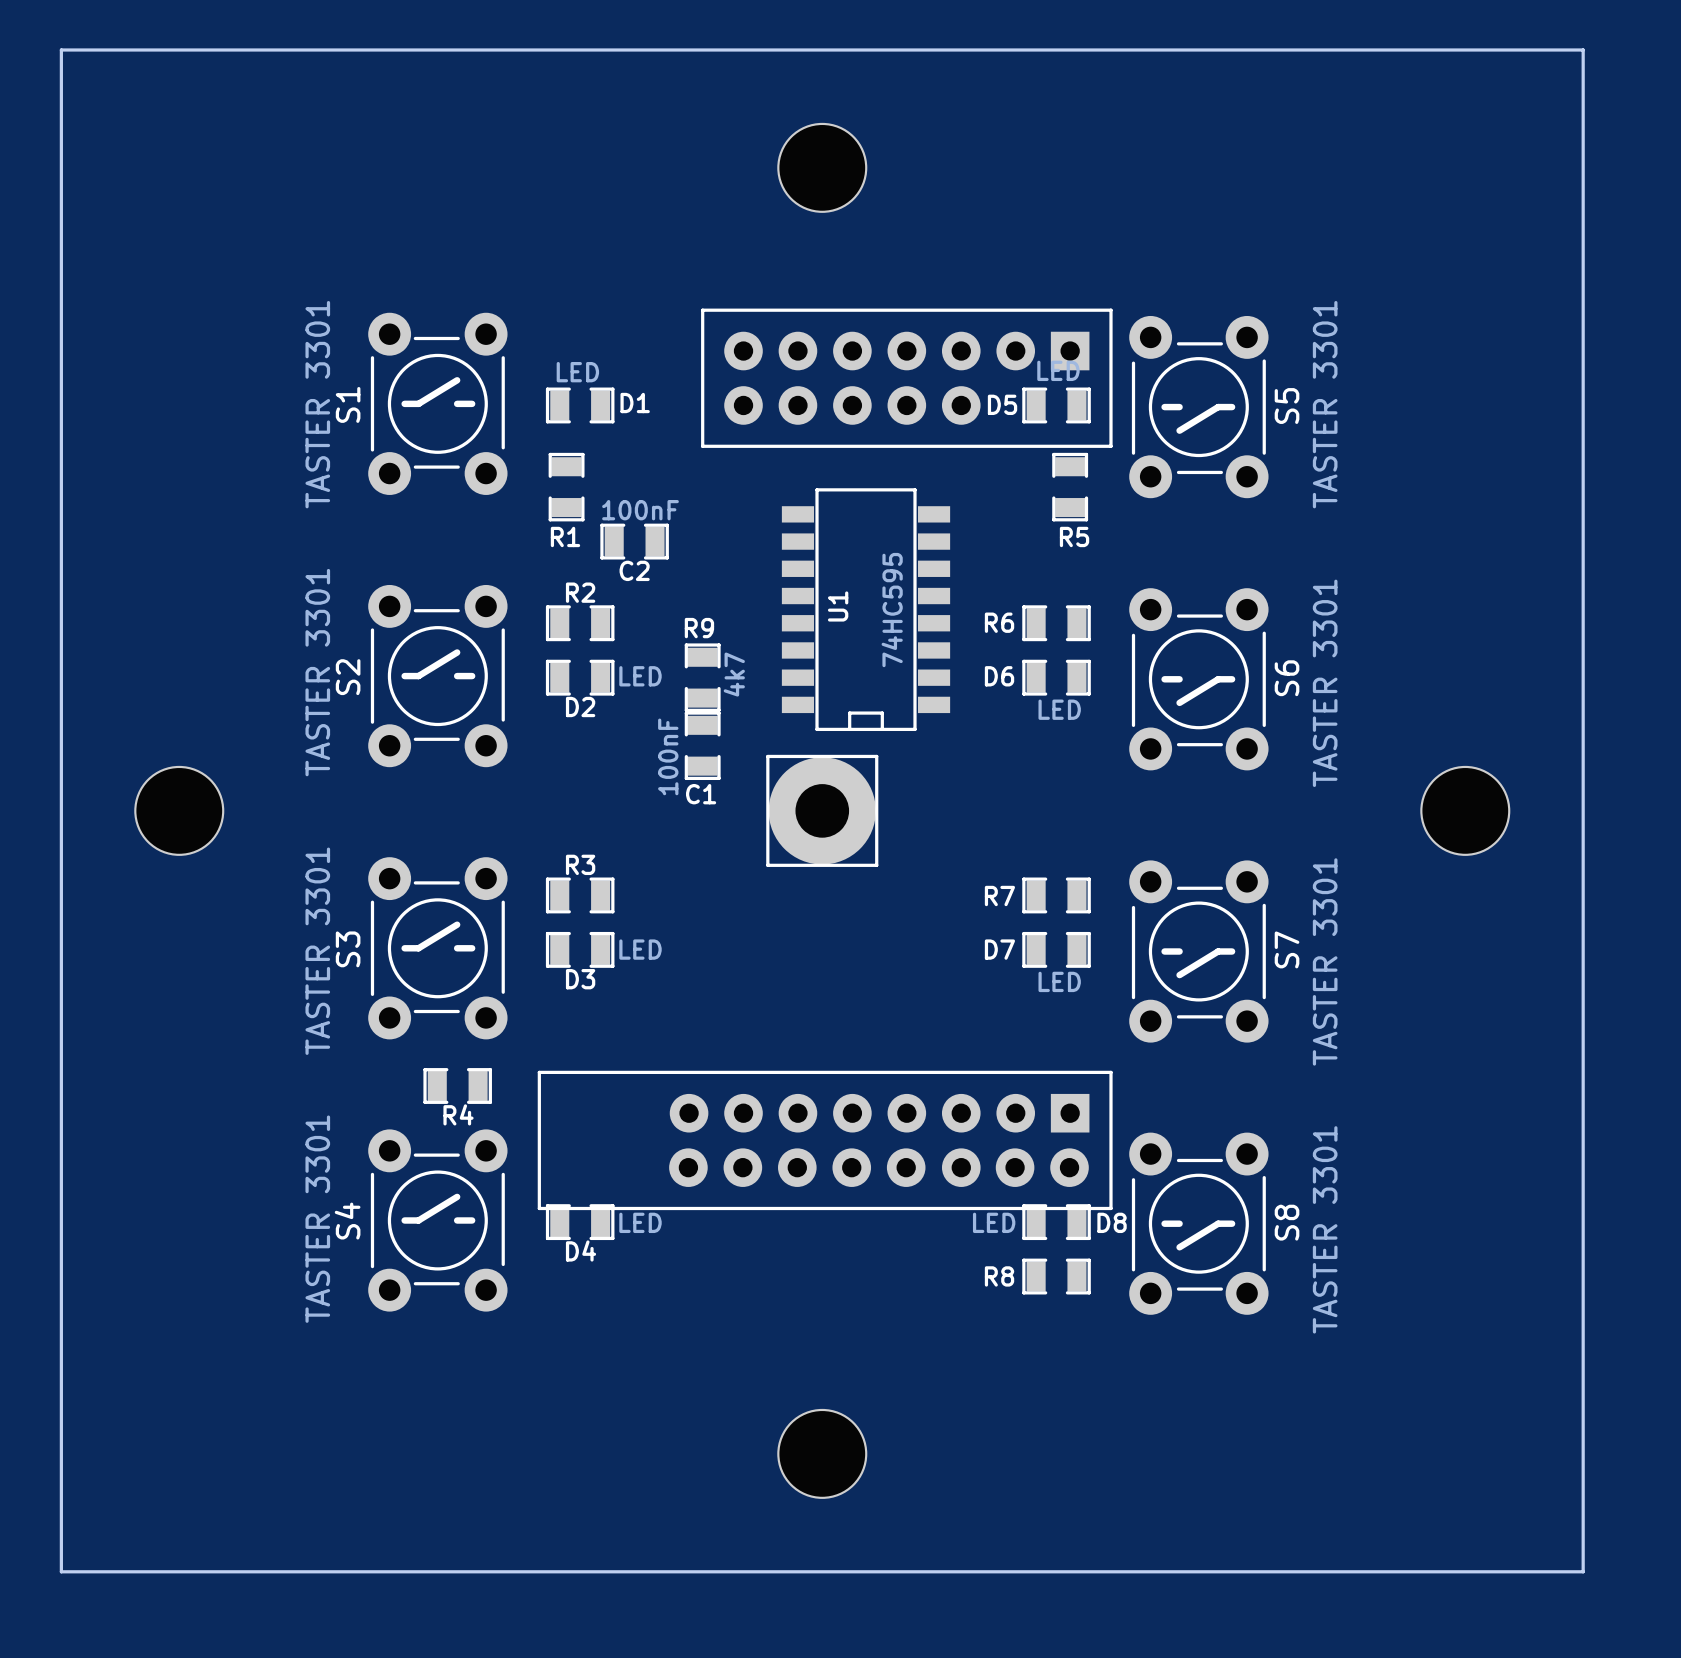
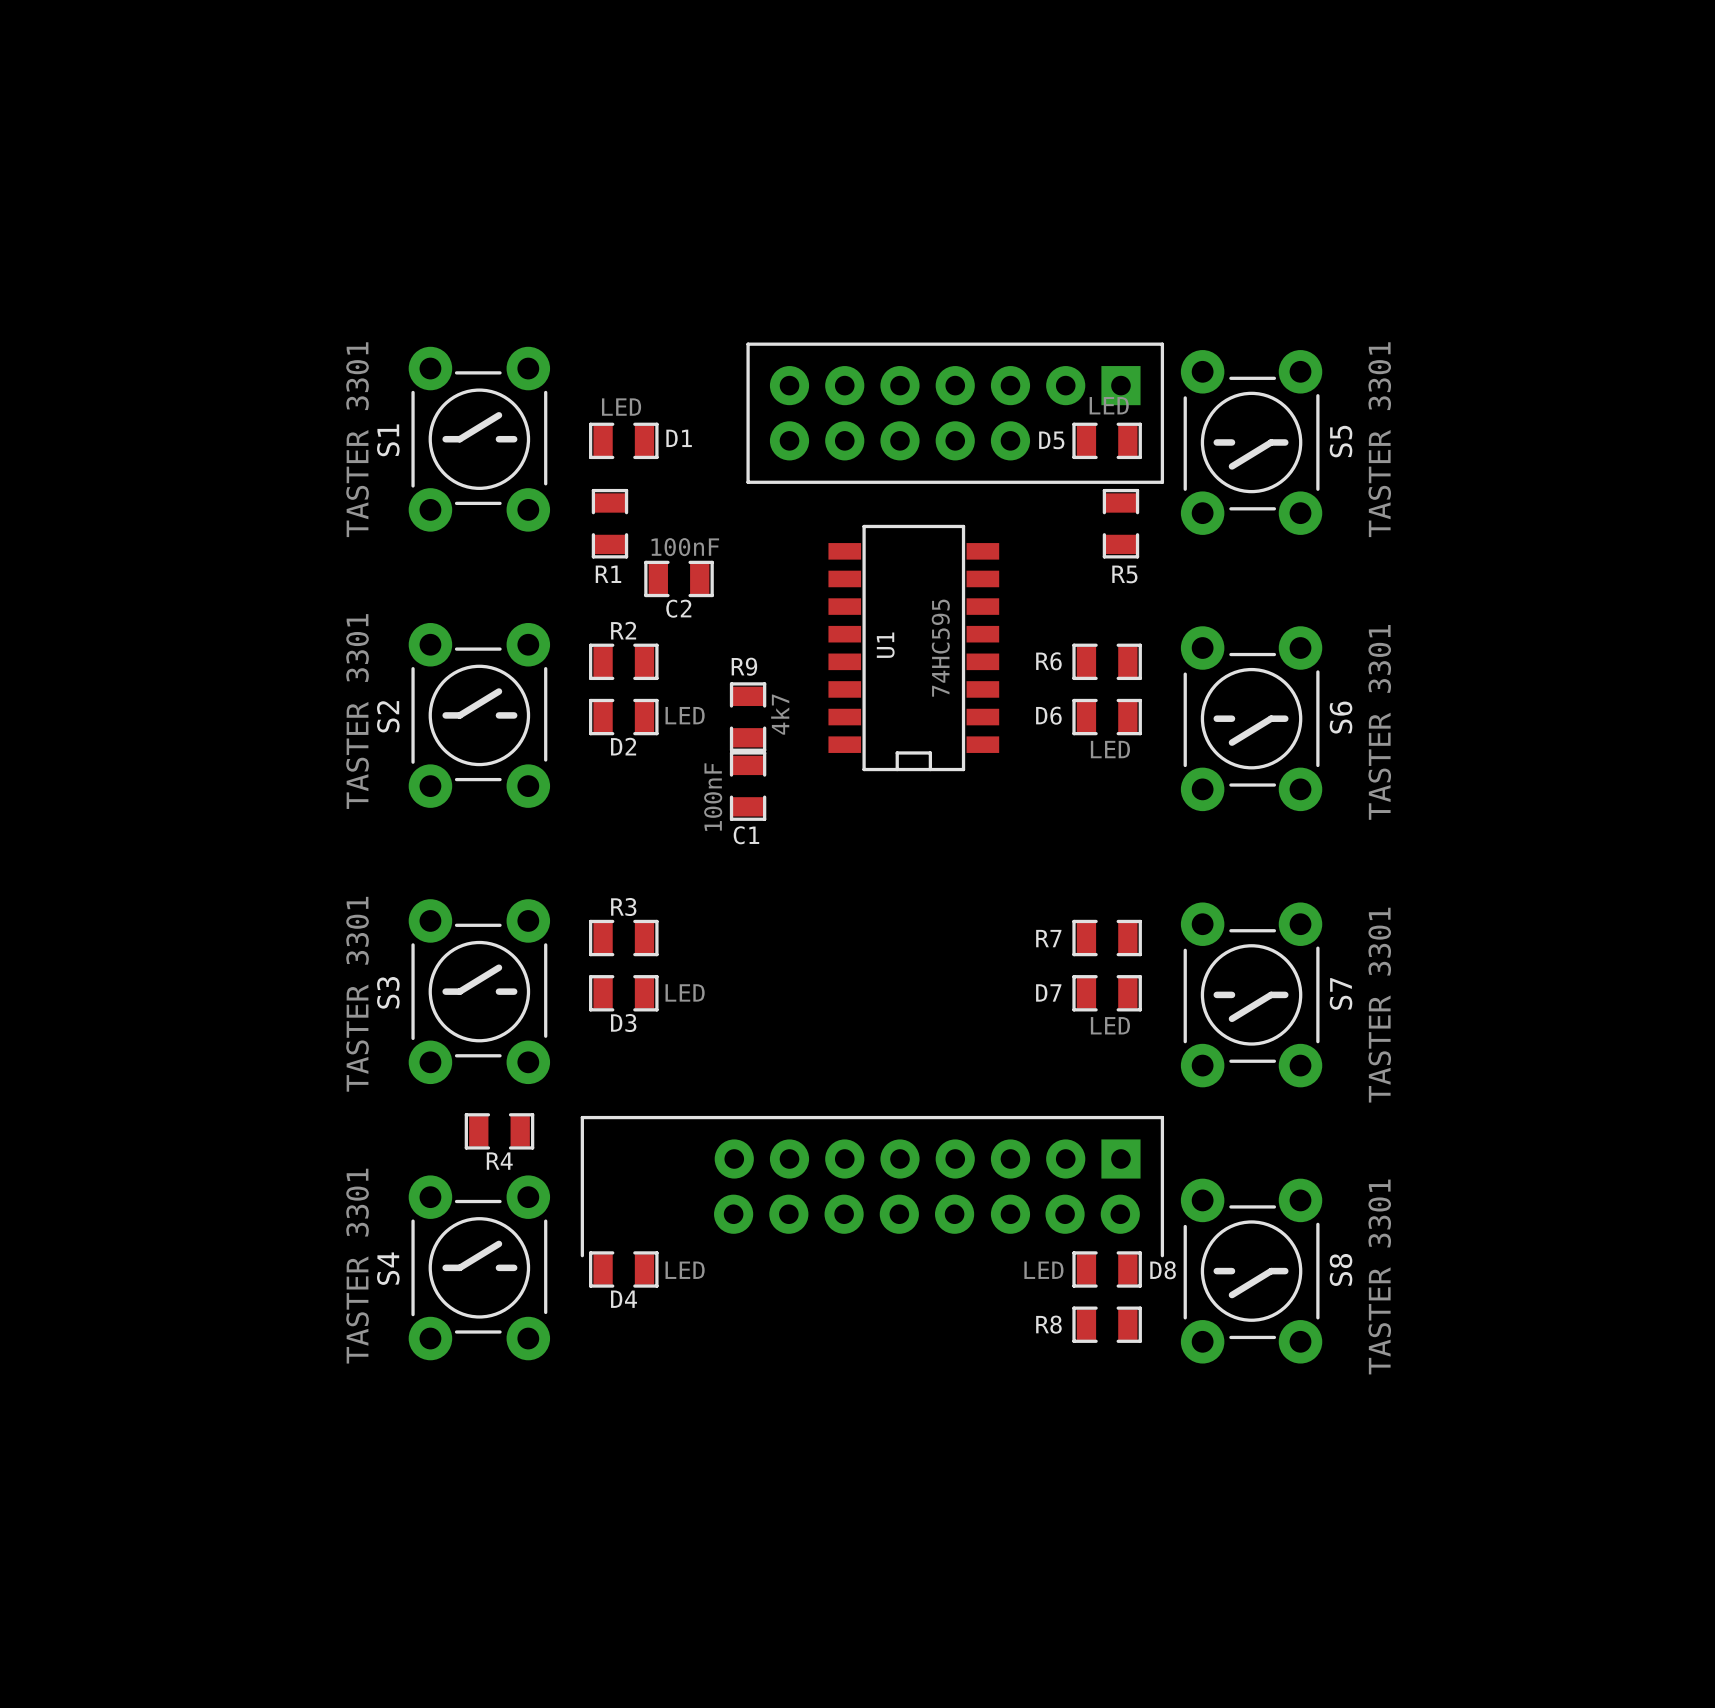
board edge: (61, 49) (1583, 49) (1583, 1571) (61, 1571) (61, 49) -> none
part: (822, 167) -> none
part: (179, 810) -> none
part: (822, 810) -> none
part: (1465, 810) -> none
line: (539, 1208) (1110, 1208) -> none
part: (822, 1453) -> none

